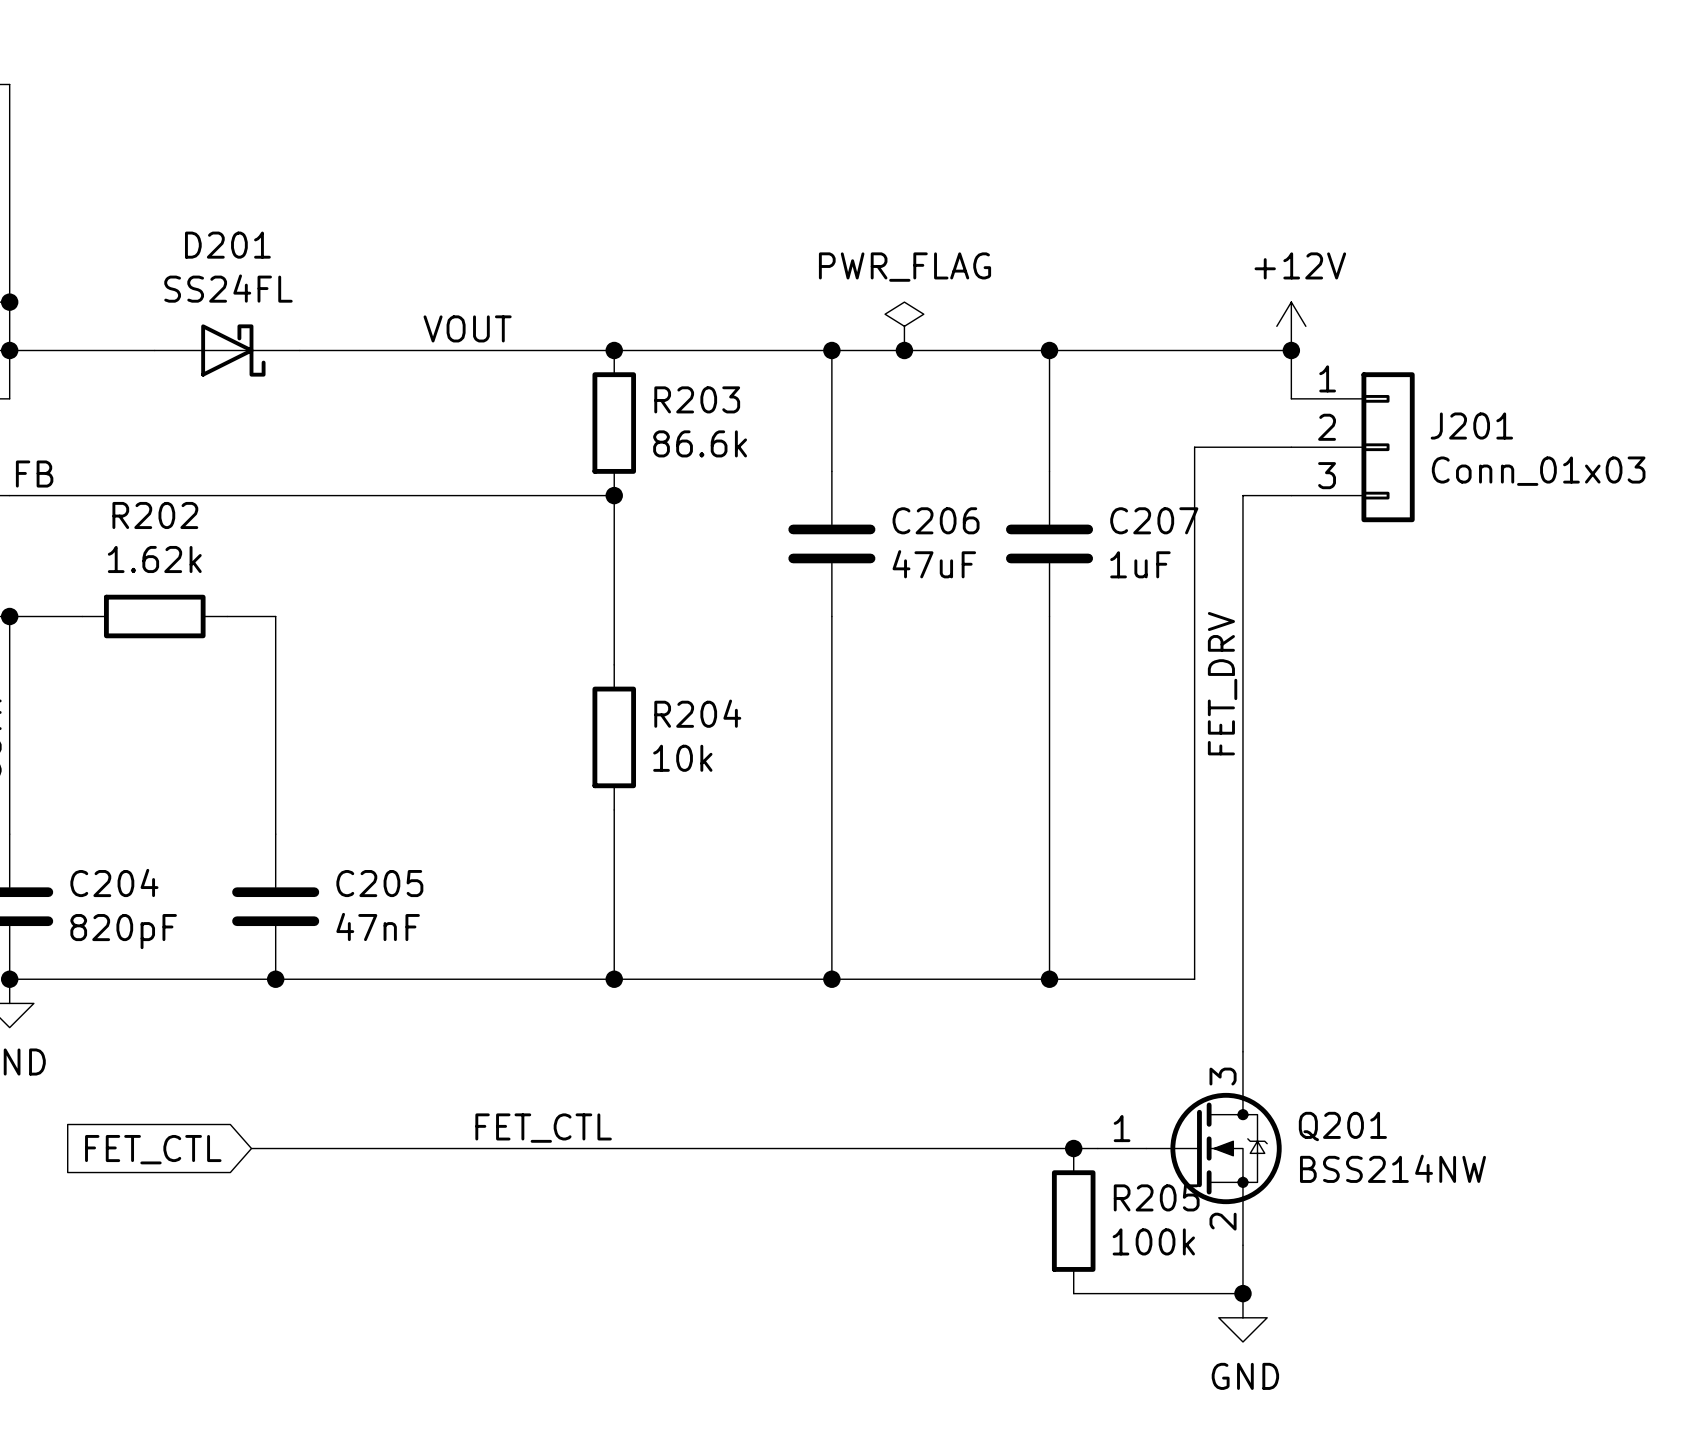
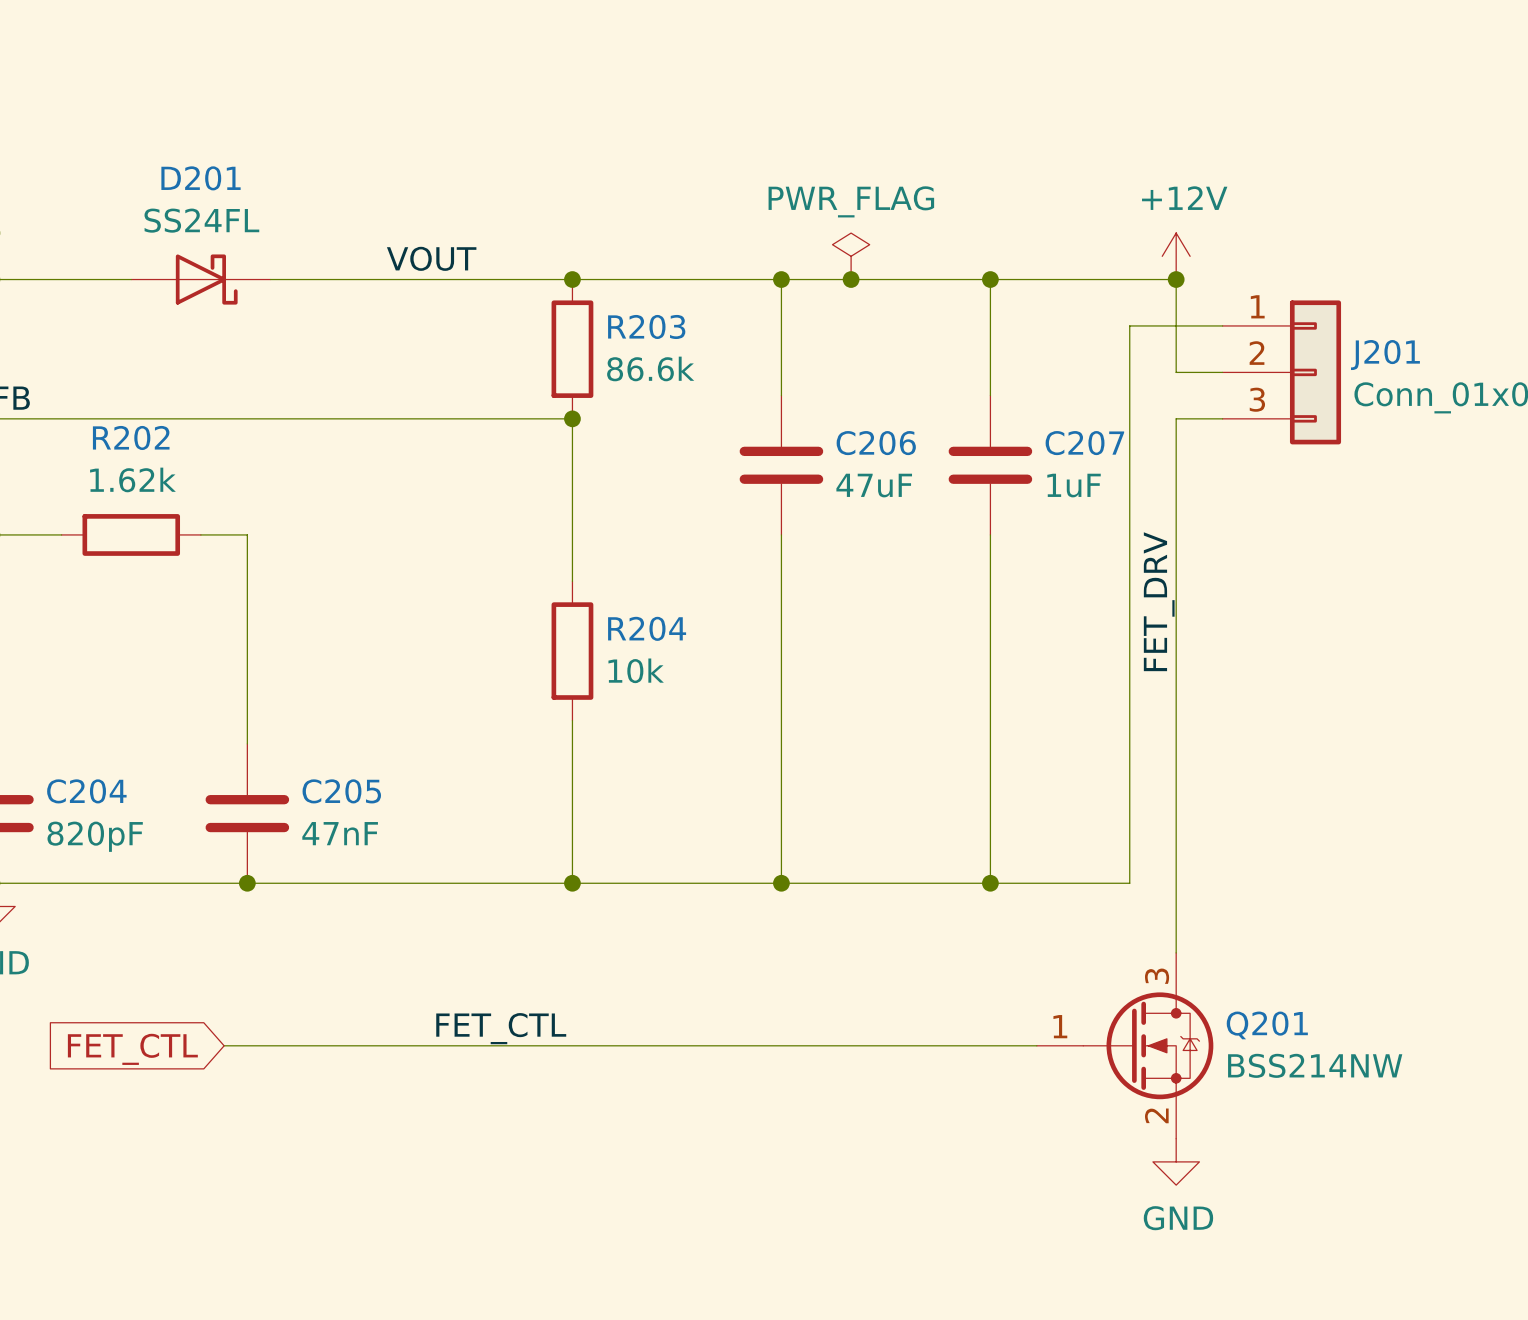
power symbol position: +12V (1291, 326) -> +12V (1176, 256)
wire: (1242, 350) (1291, 350) (1291, 398) -> (1176, 279) (1176, 372)
junction position: (1291, 350) -> (1176, 279)
wire: (1194, 447) (1242, 447) -> (1129, 372) (1129, 325) (1222, 325)
junction: (1073, 1148) -> none
R205: 100k (1073, 1221) -> none
wire: (1242, 1245) (1242, 1293) (1073, 1293) -> none
junction: (1242, 1293) -> none
power symbol position: GND (1242, 1317) -> GND (1176, 1161)

